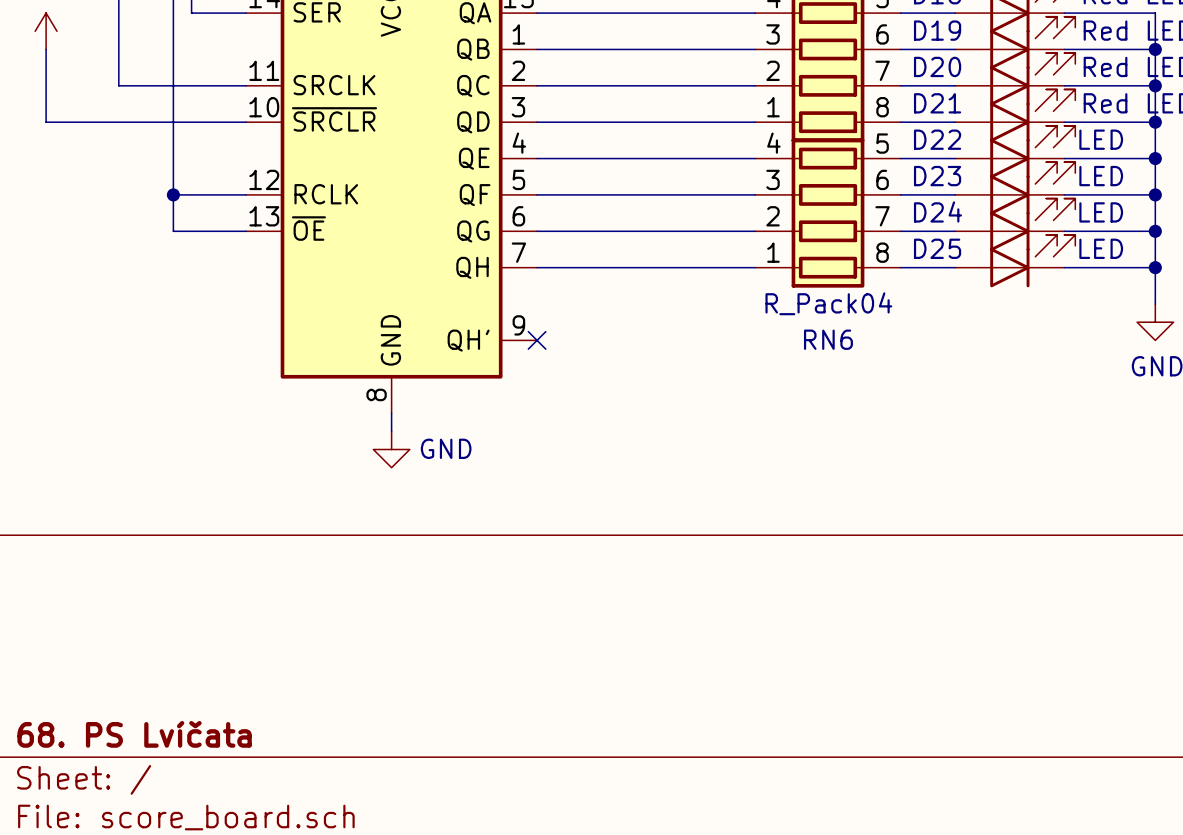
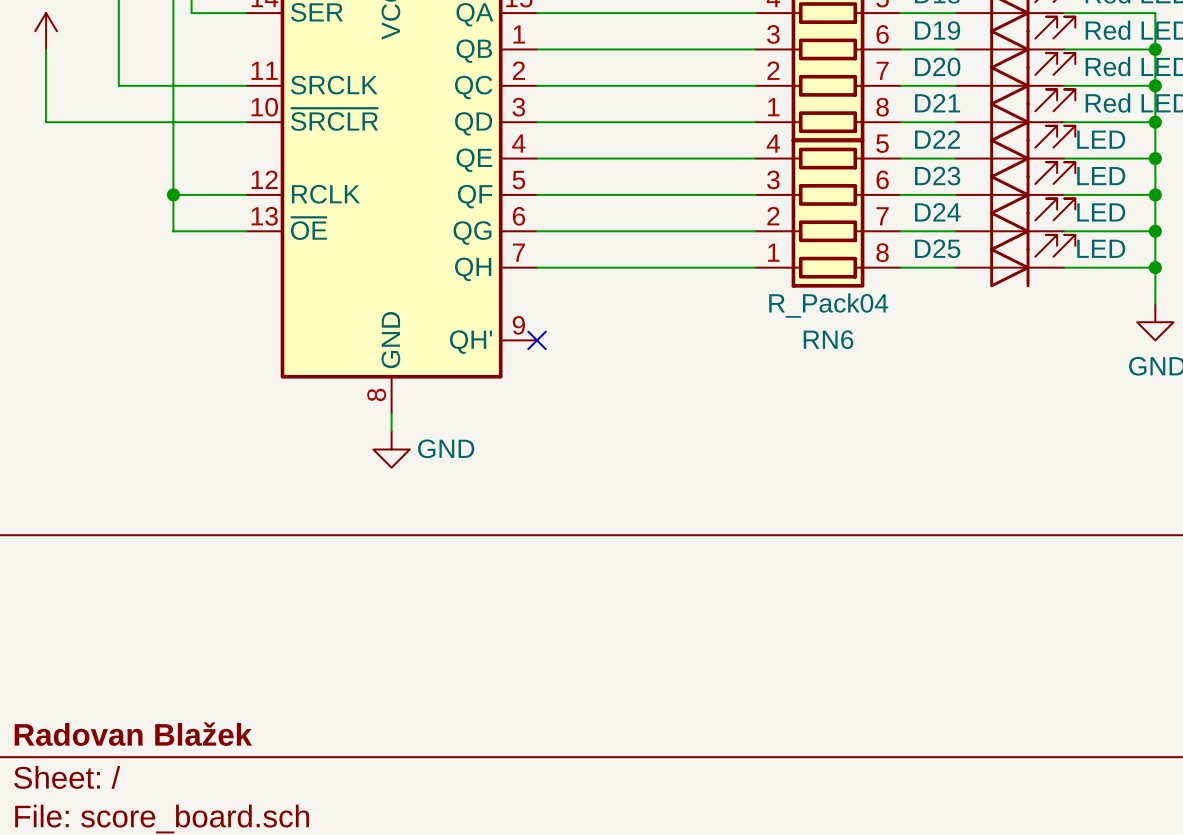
title block: 68. PS Lvíčata (134, 734) -> Radovan Blažek (133, 734)

